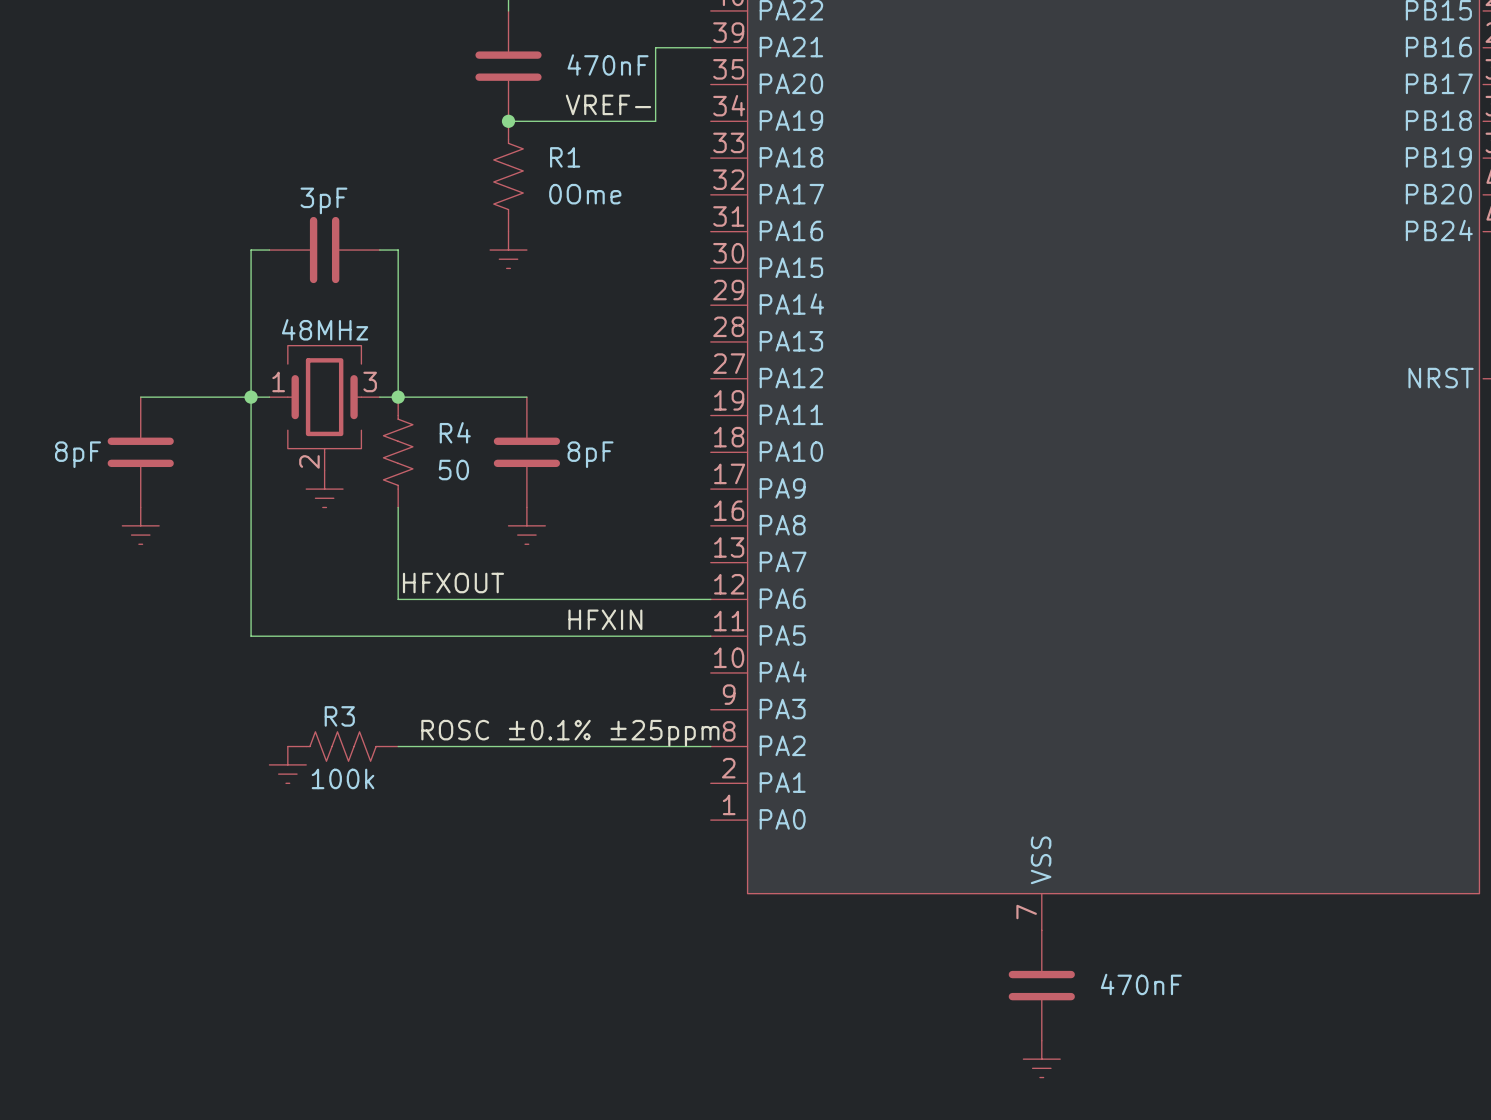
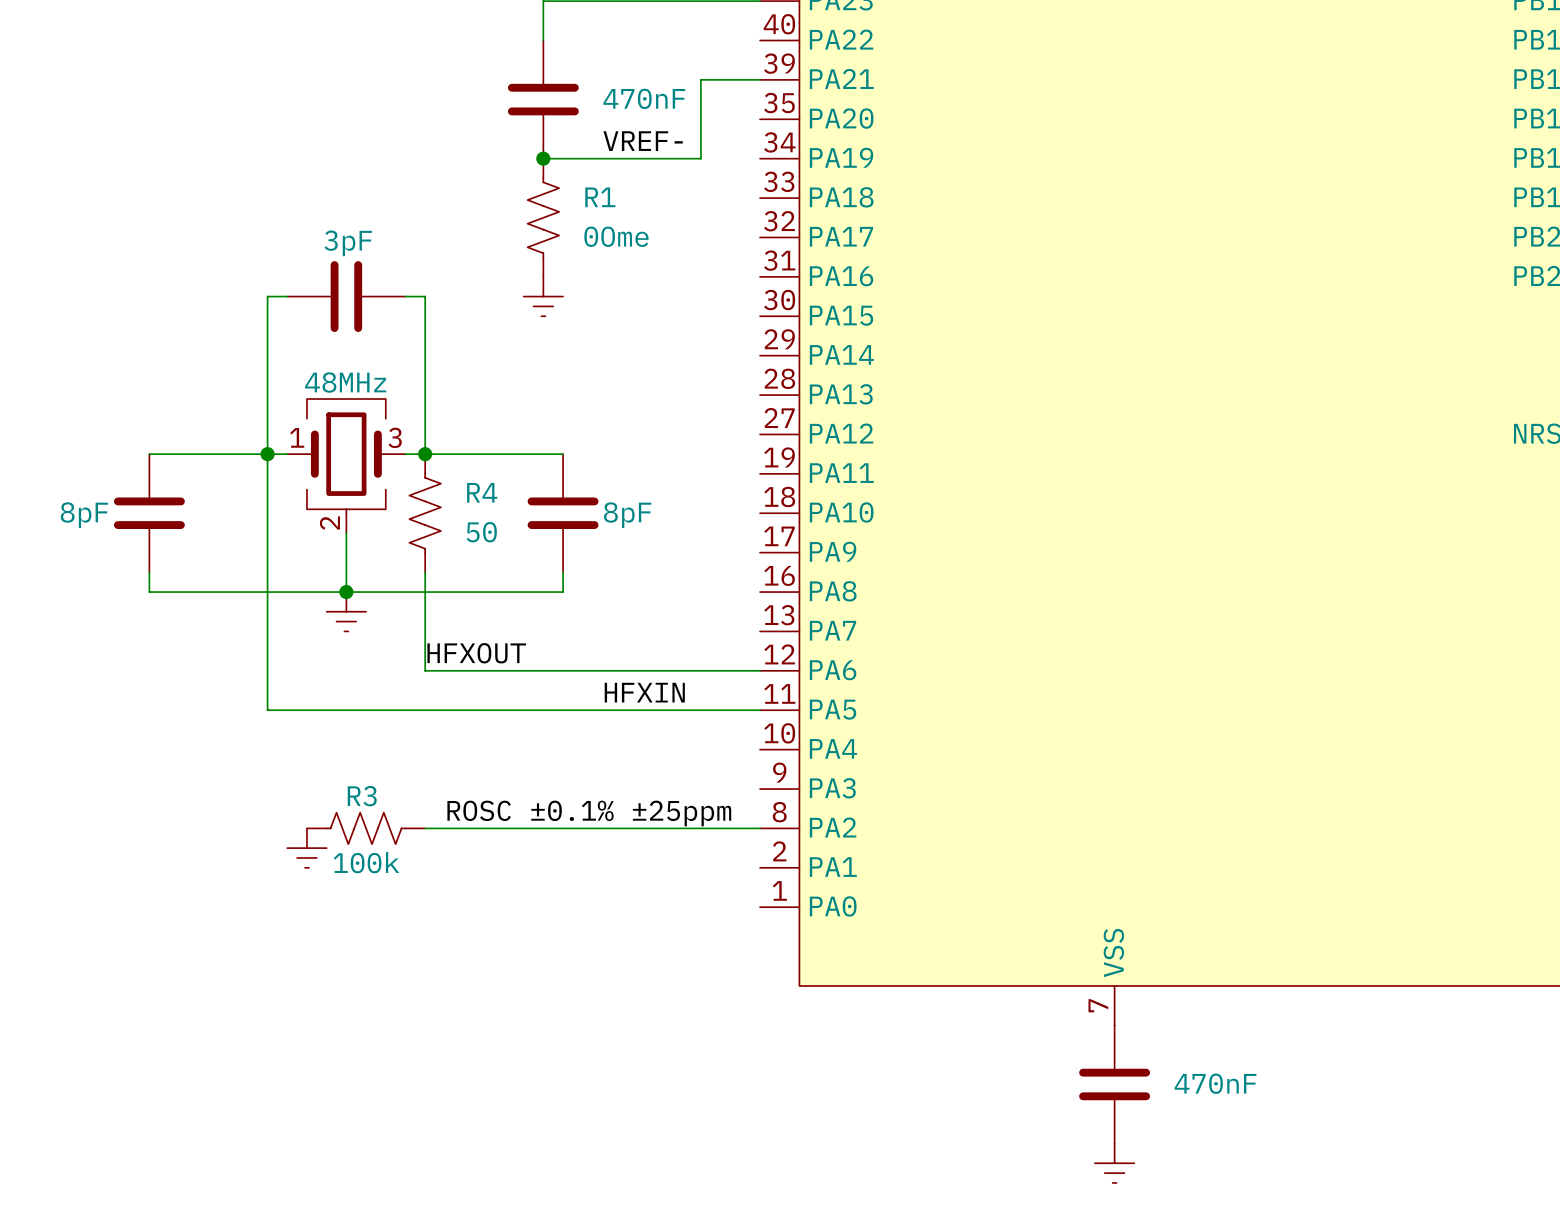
wire: none -> (346, 532) (346, 592)
power symbol position: (324, 489) -> (346, 611)
wire: none -> (149, 572) (149, 592) (563, 592) (563, 572)
power symbol: (140, 525) -> none
junction: none -> (346, 592)
power symbol: (526, 525) -> none

